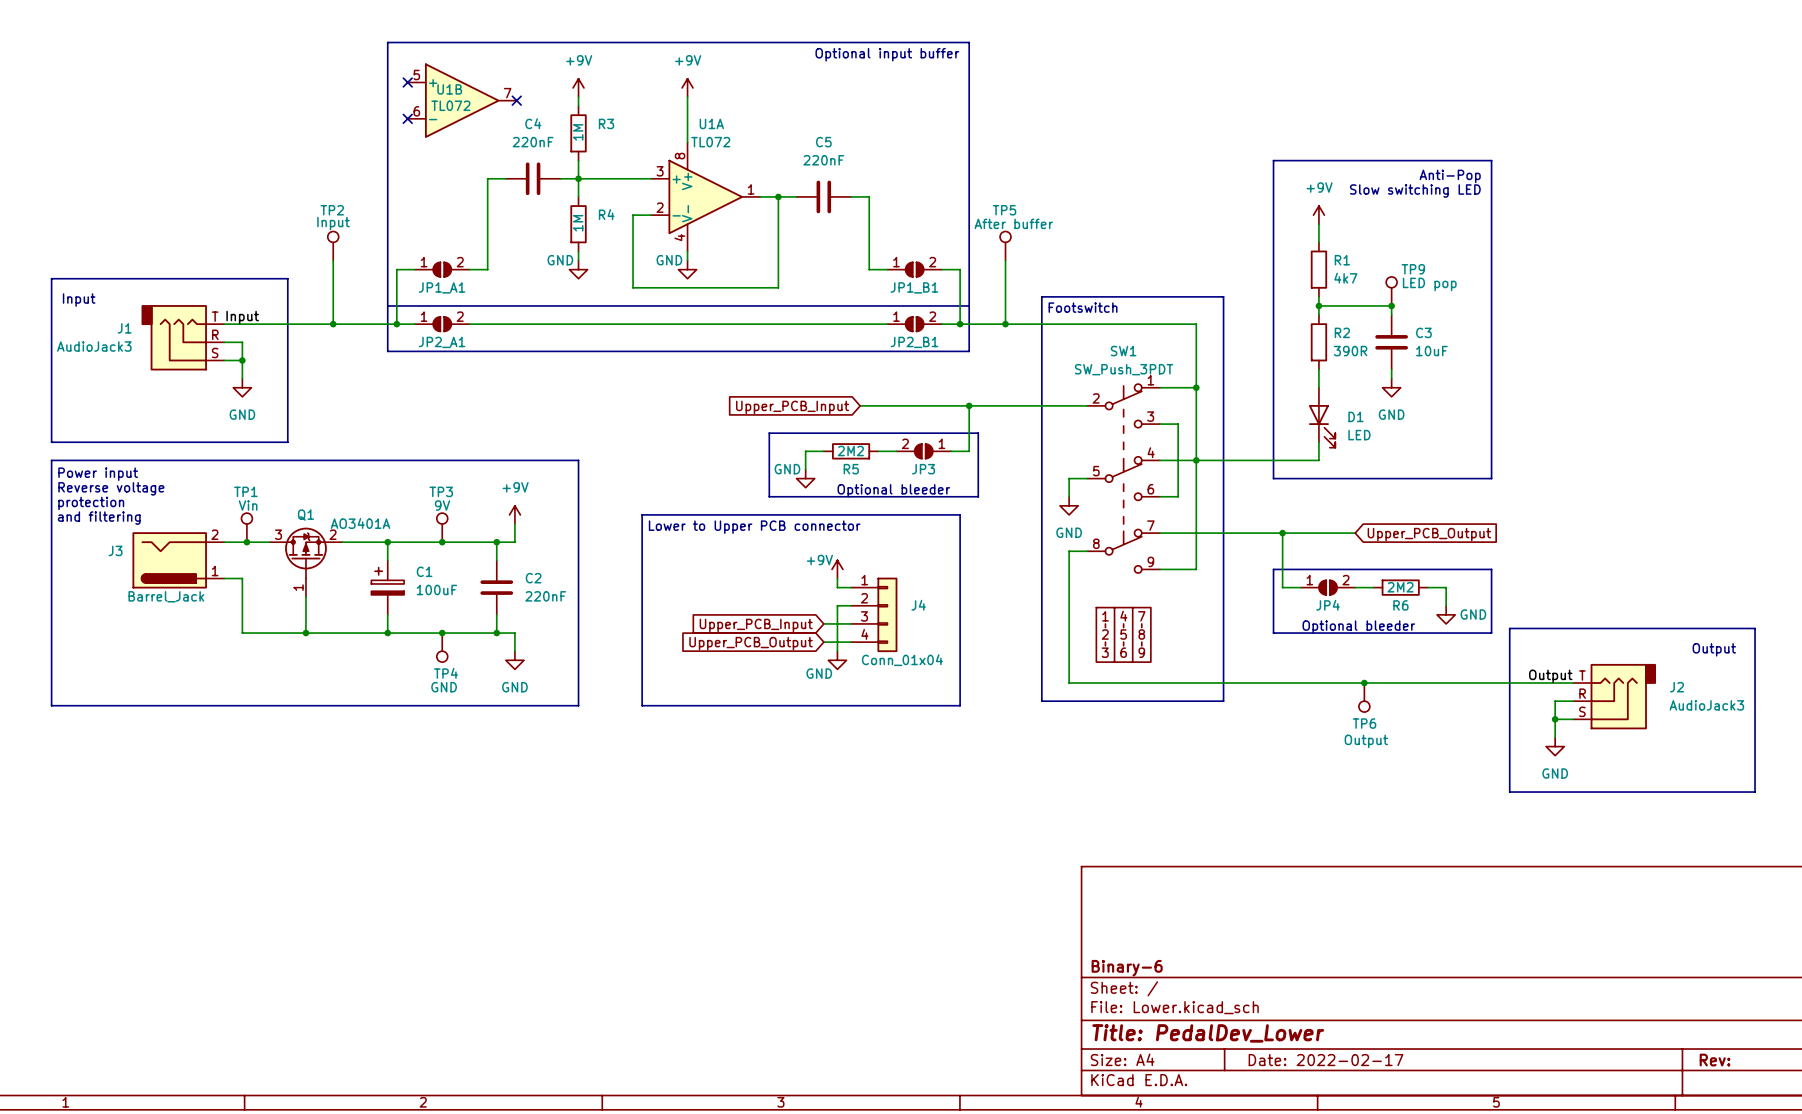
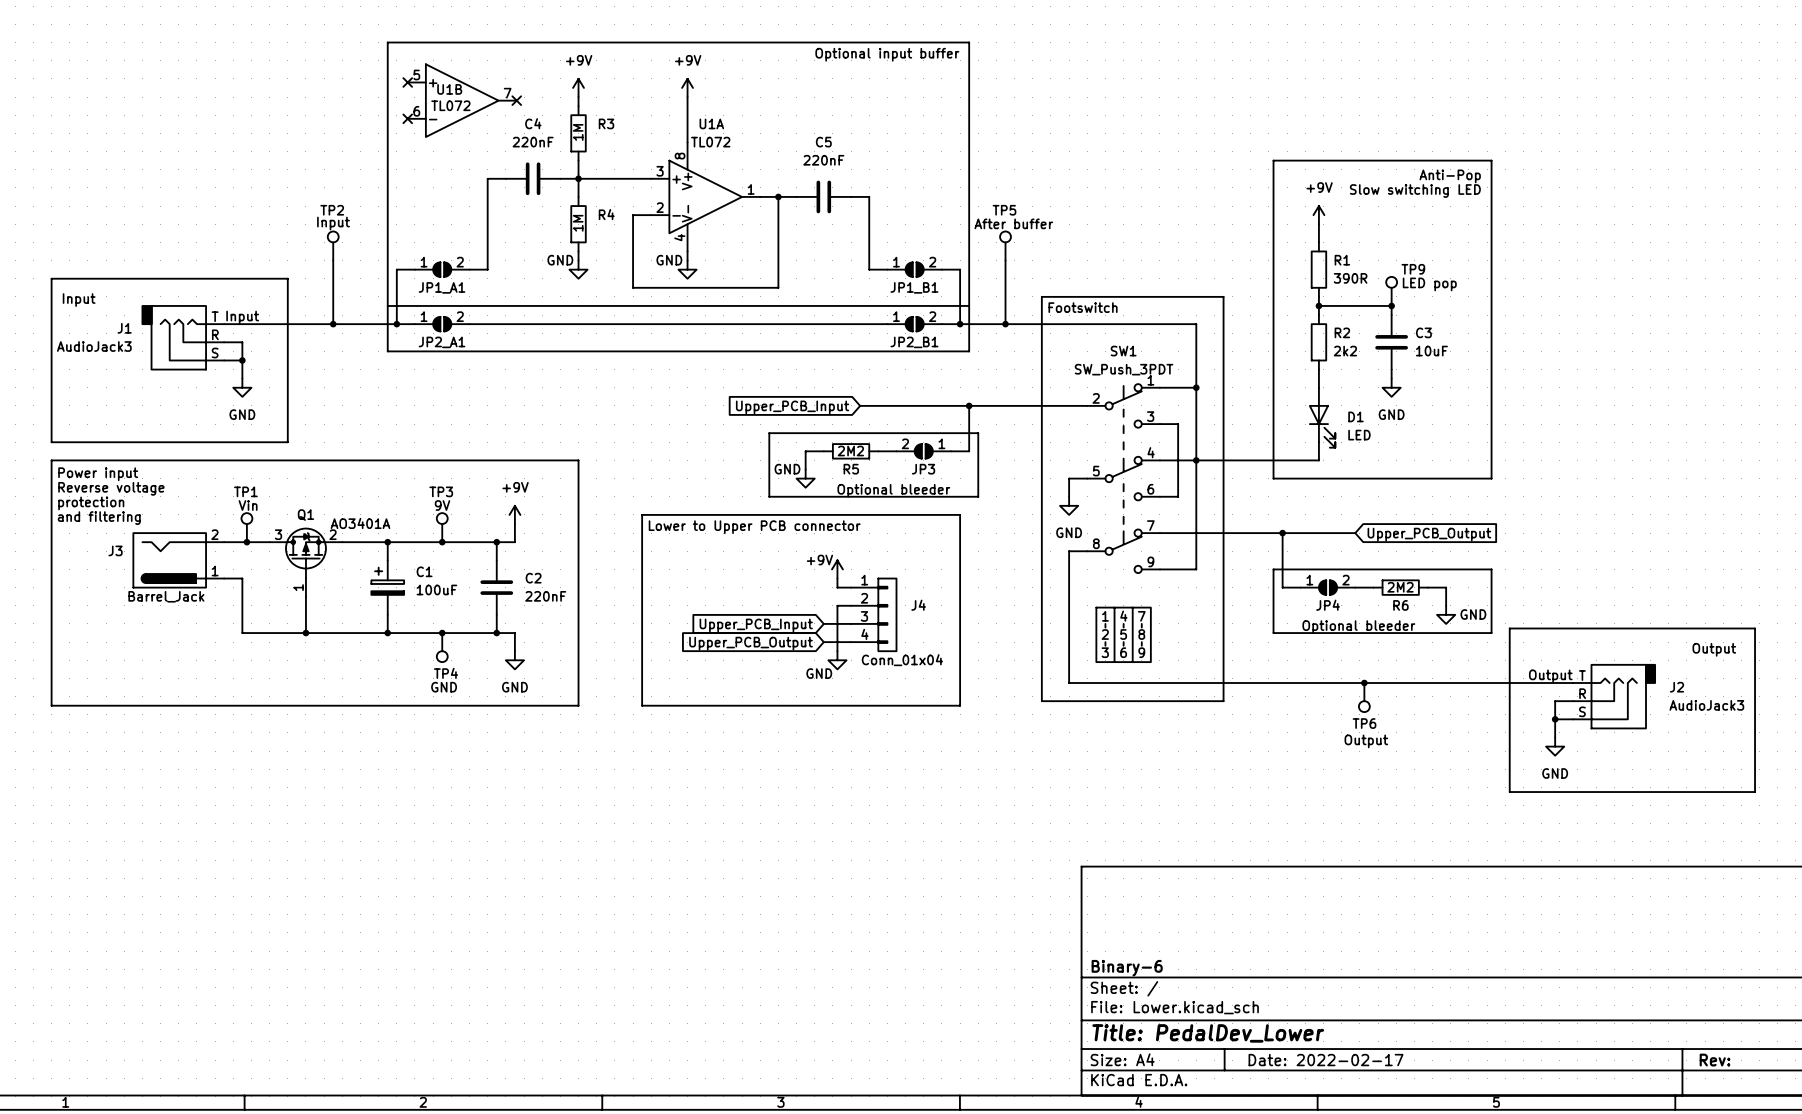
R1 value: 4k7 (1345, 278) -> 390R (1350, 278)
R2 value: 390R (1350, 351) -> 2k2 (1345, 351)

